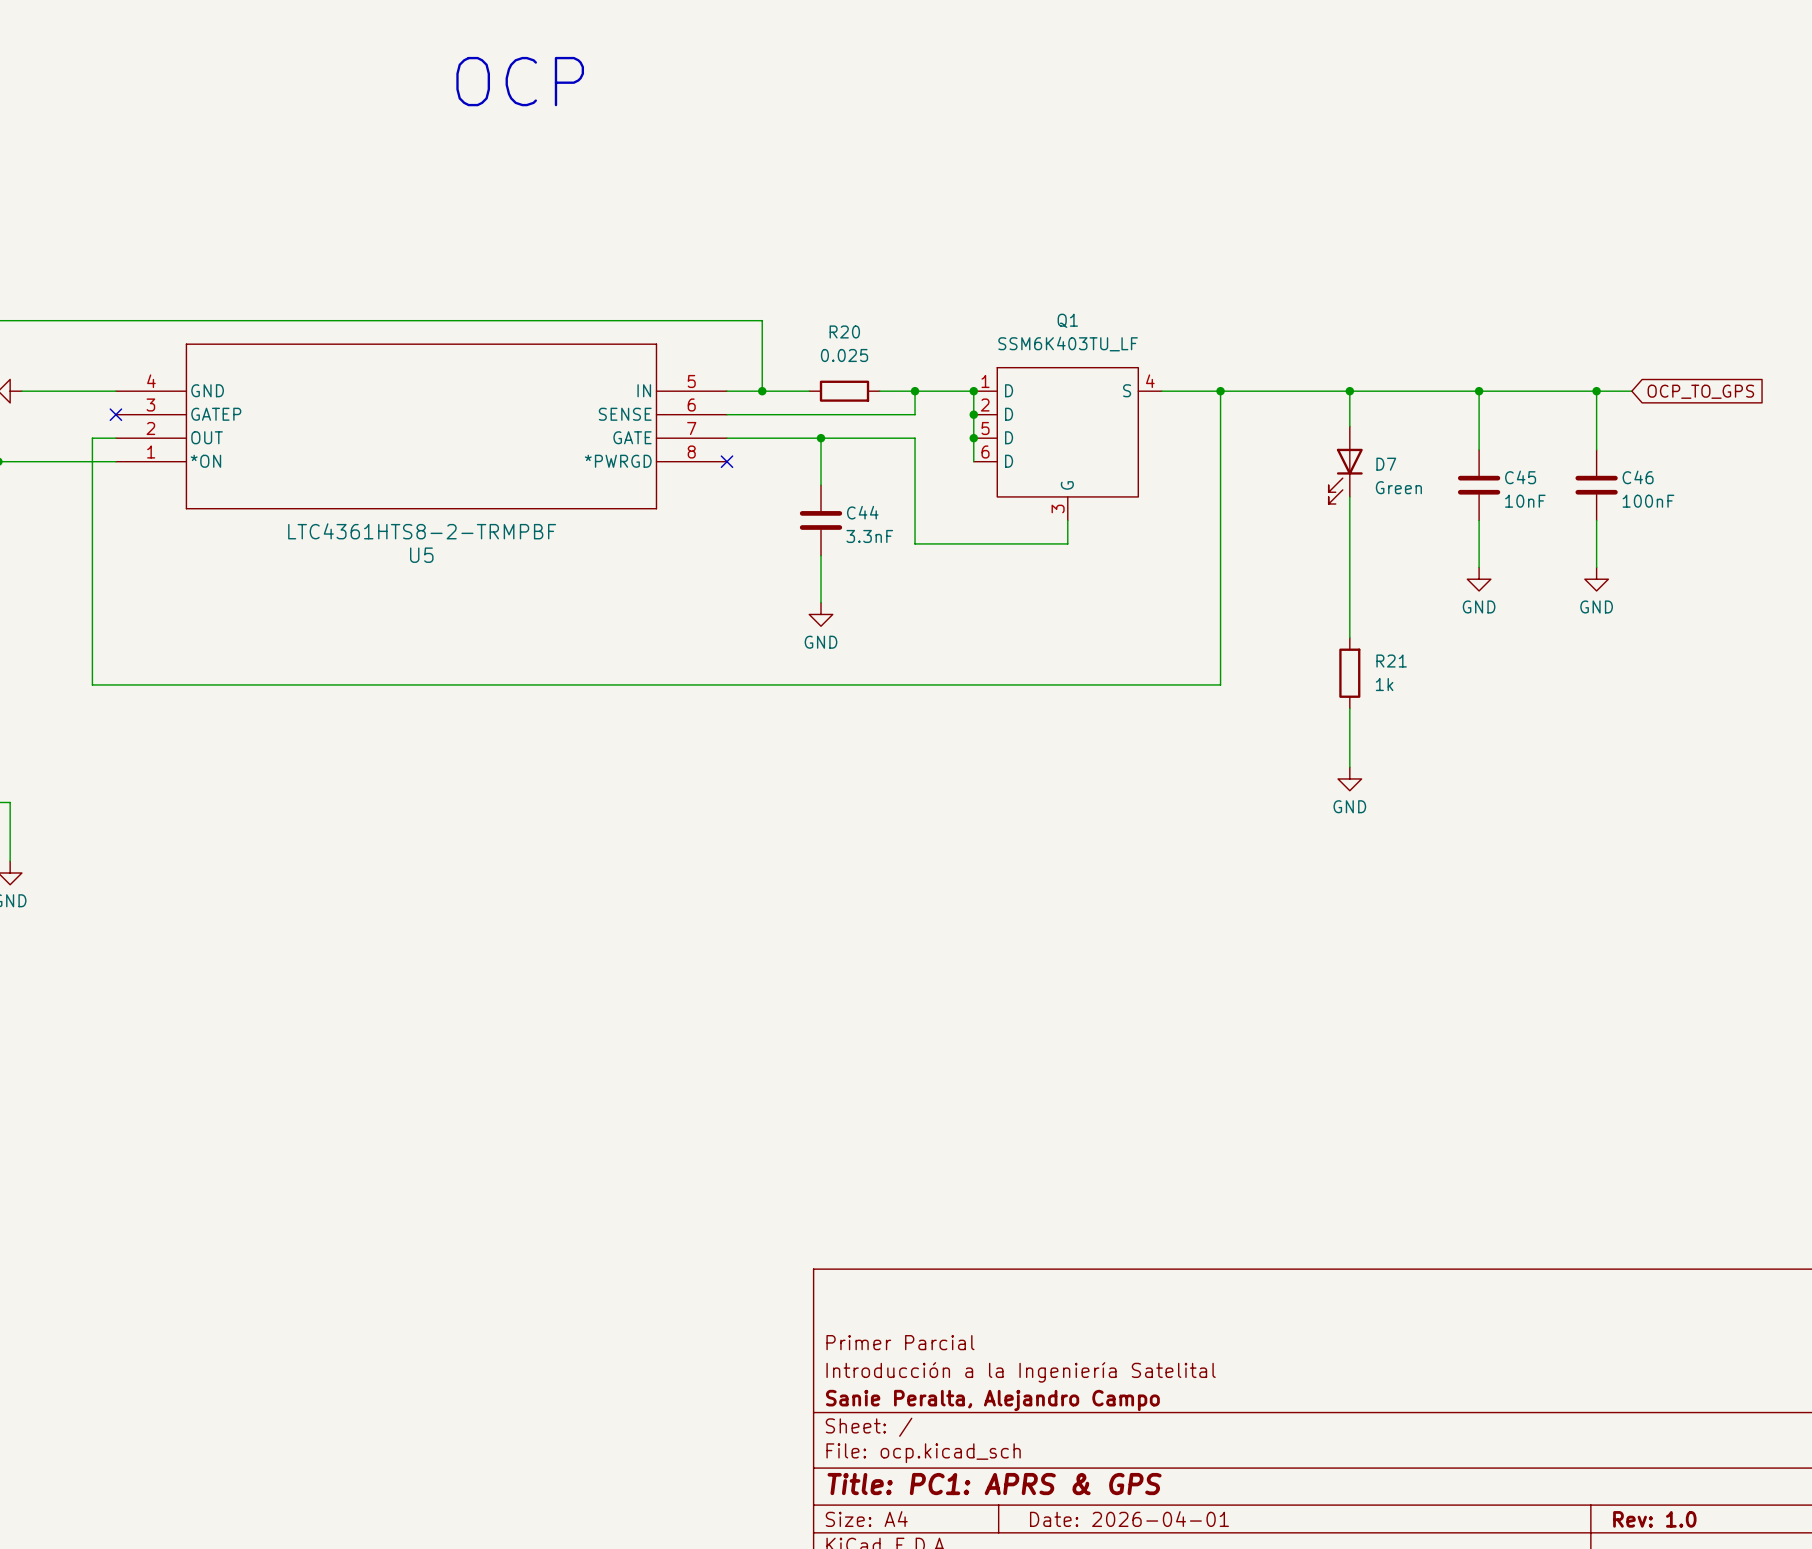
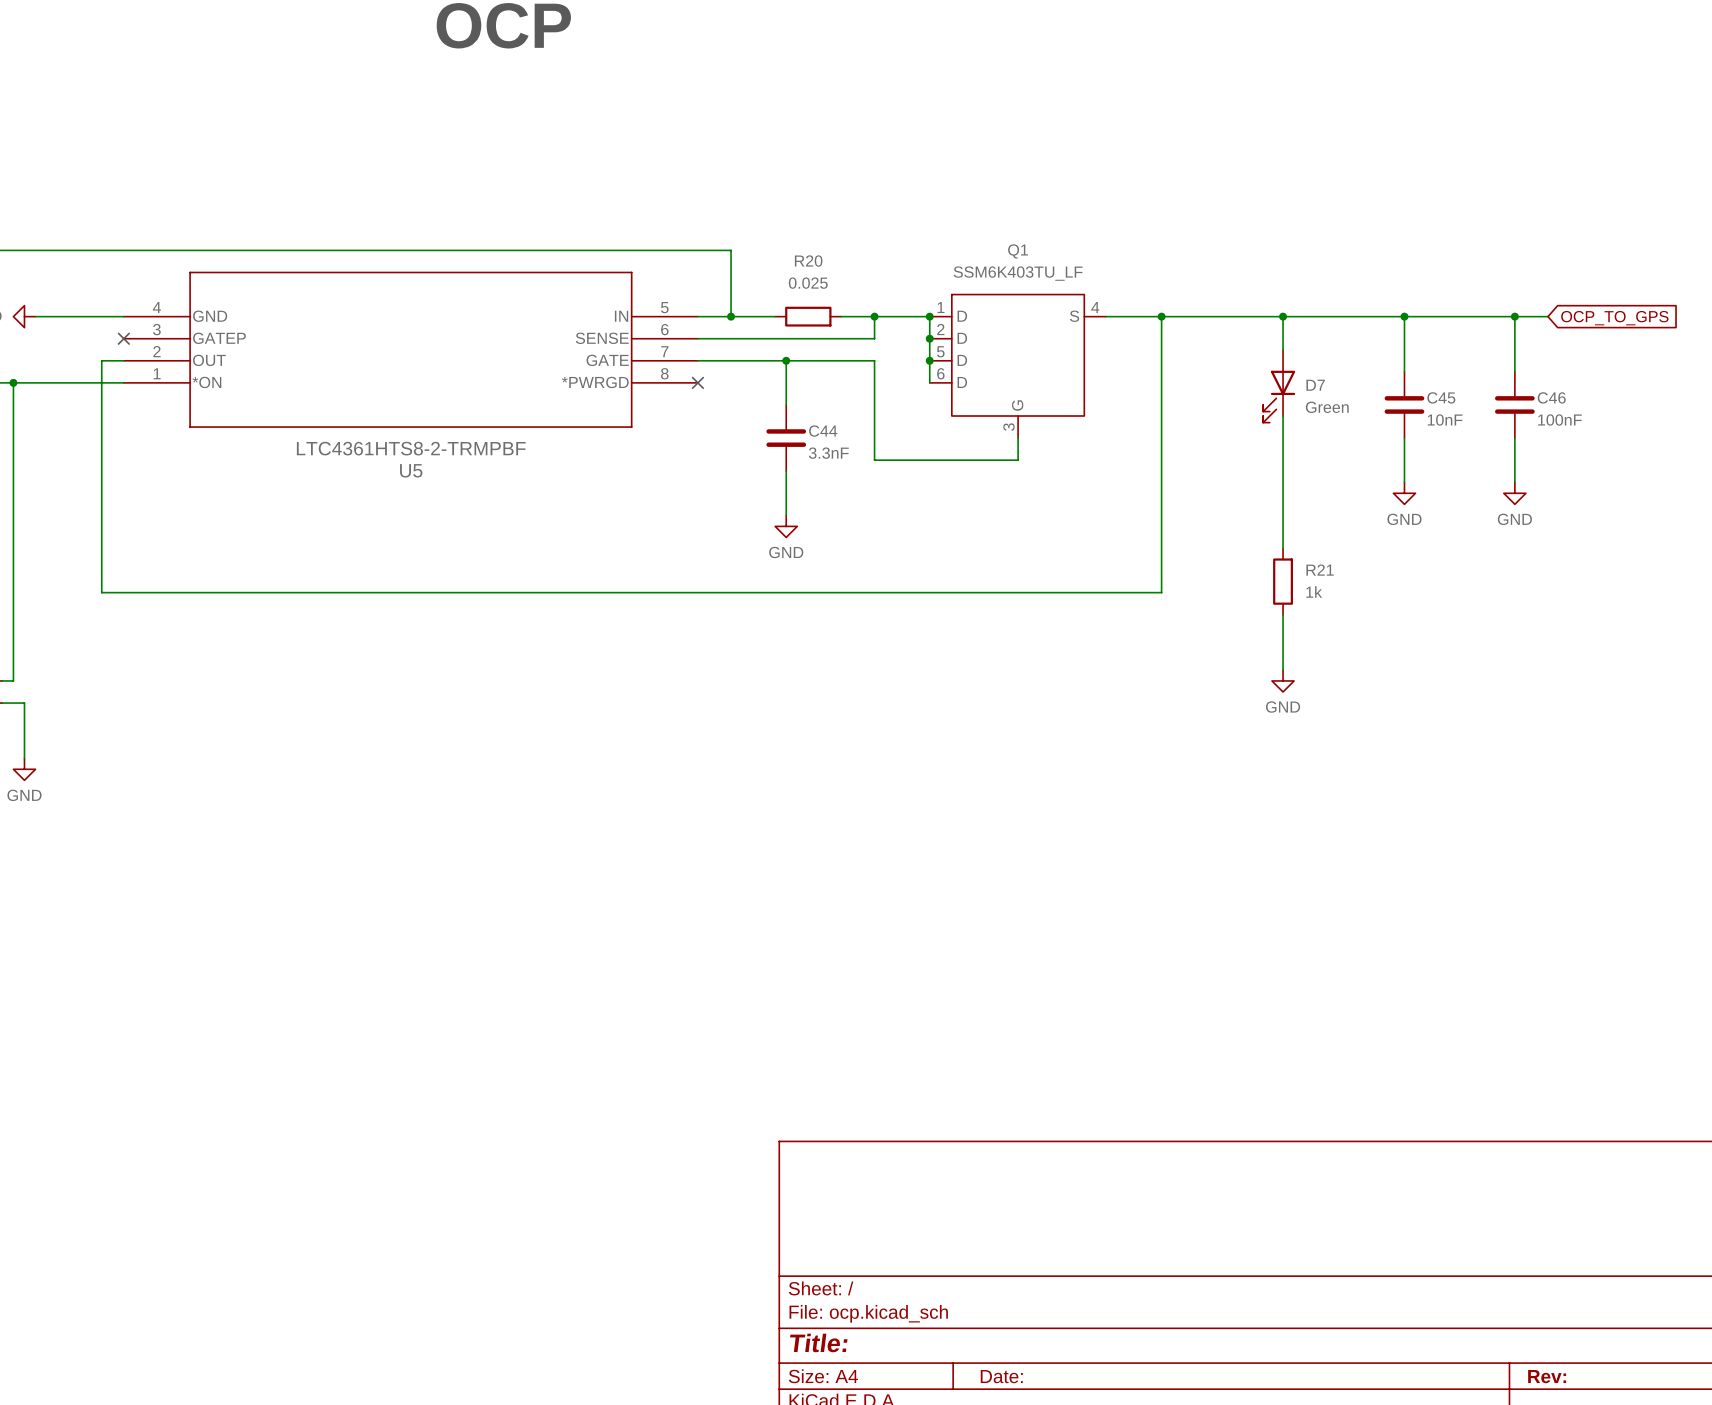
title block: Primer Parcial (900, 1342) -> none
title block: Introducción a la Ingeniería Satelital (1021, 1372) -> none
title block: Sanie Peralta, Alejandro Campo (992, 1400) -> none
title block: Title: PC1: APRS & GPS (994, 1484) -> Title: (818, 1342)
title block: Date: 2026-04-01 (1129, 1519) -> Date: (1001, 1376)
title block: Rev: 1.0 (1654, 1519) -> Rev: (1547, 1376)

